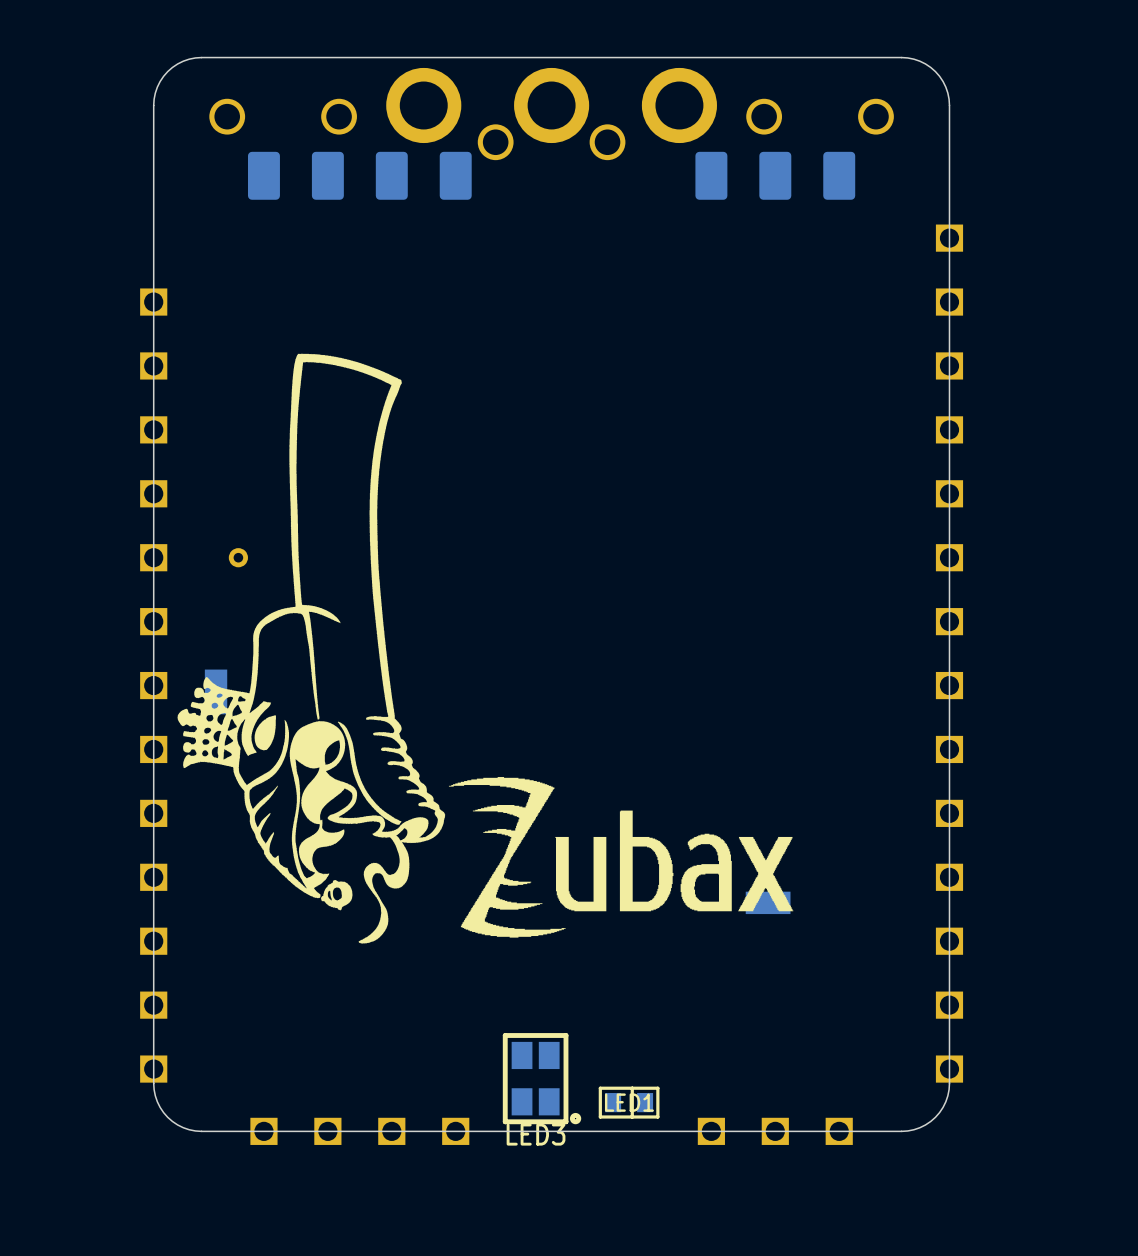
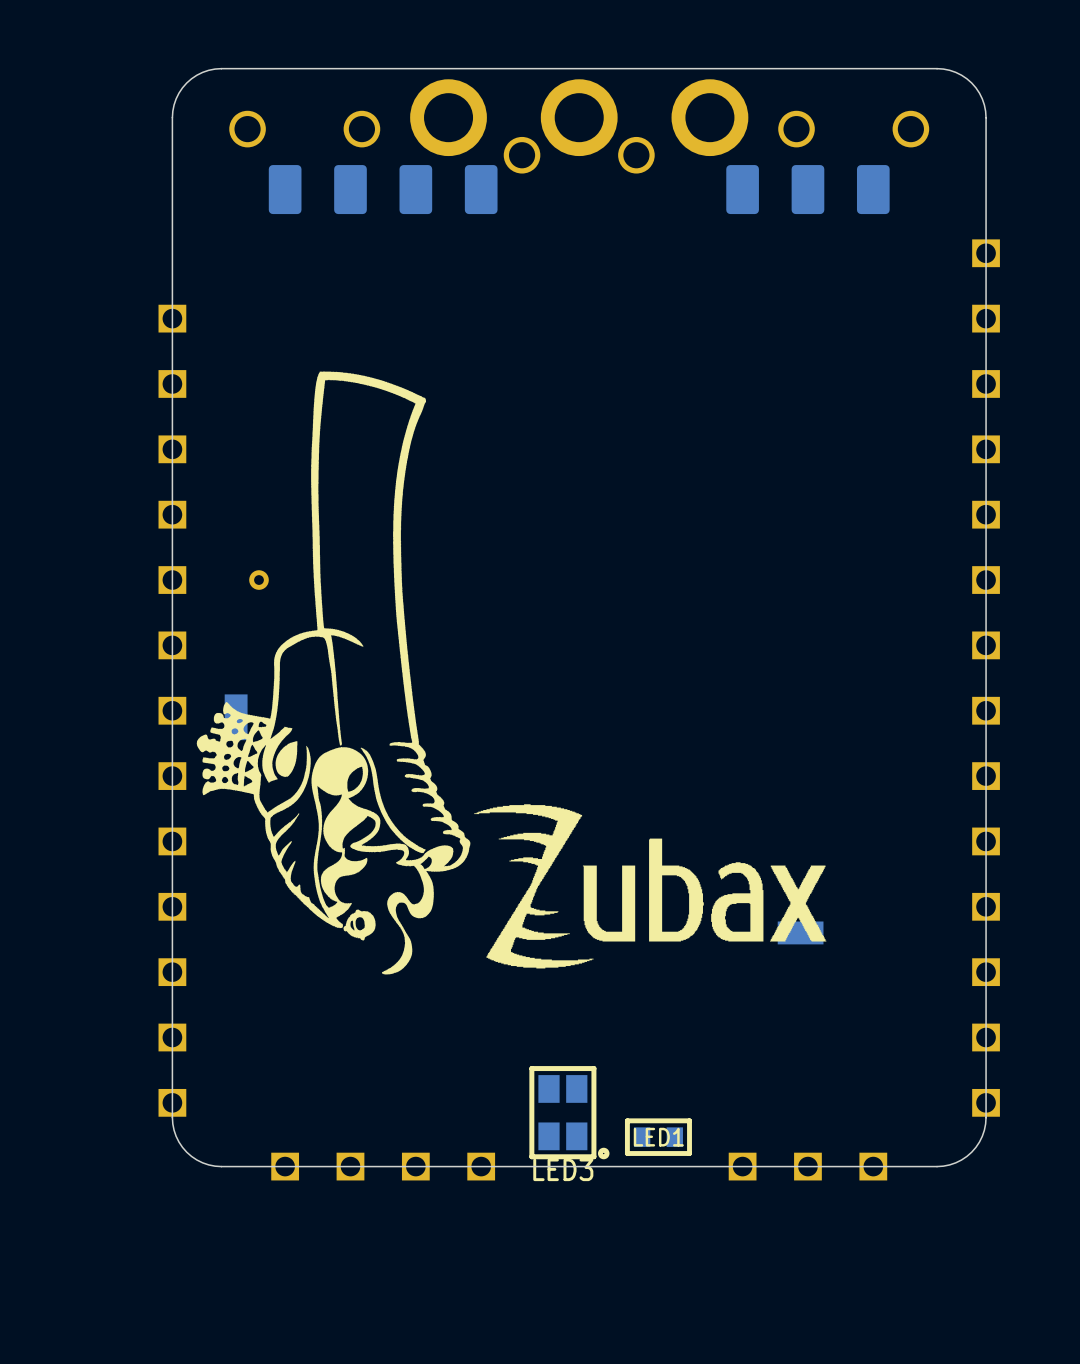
LED1 footprint: [598, 1086, 660, 1119] -> [624, 1118, 692, 1156]

